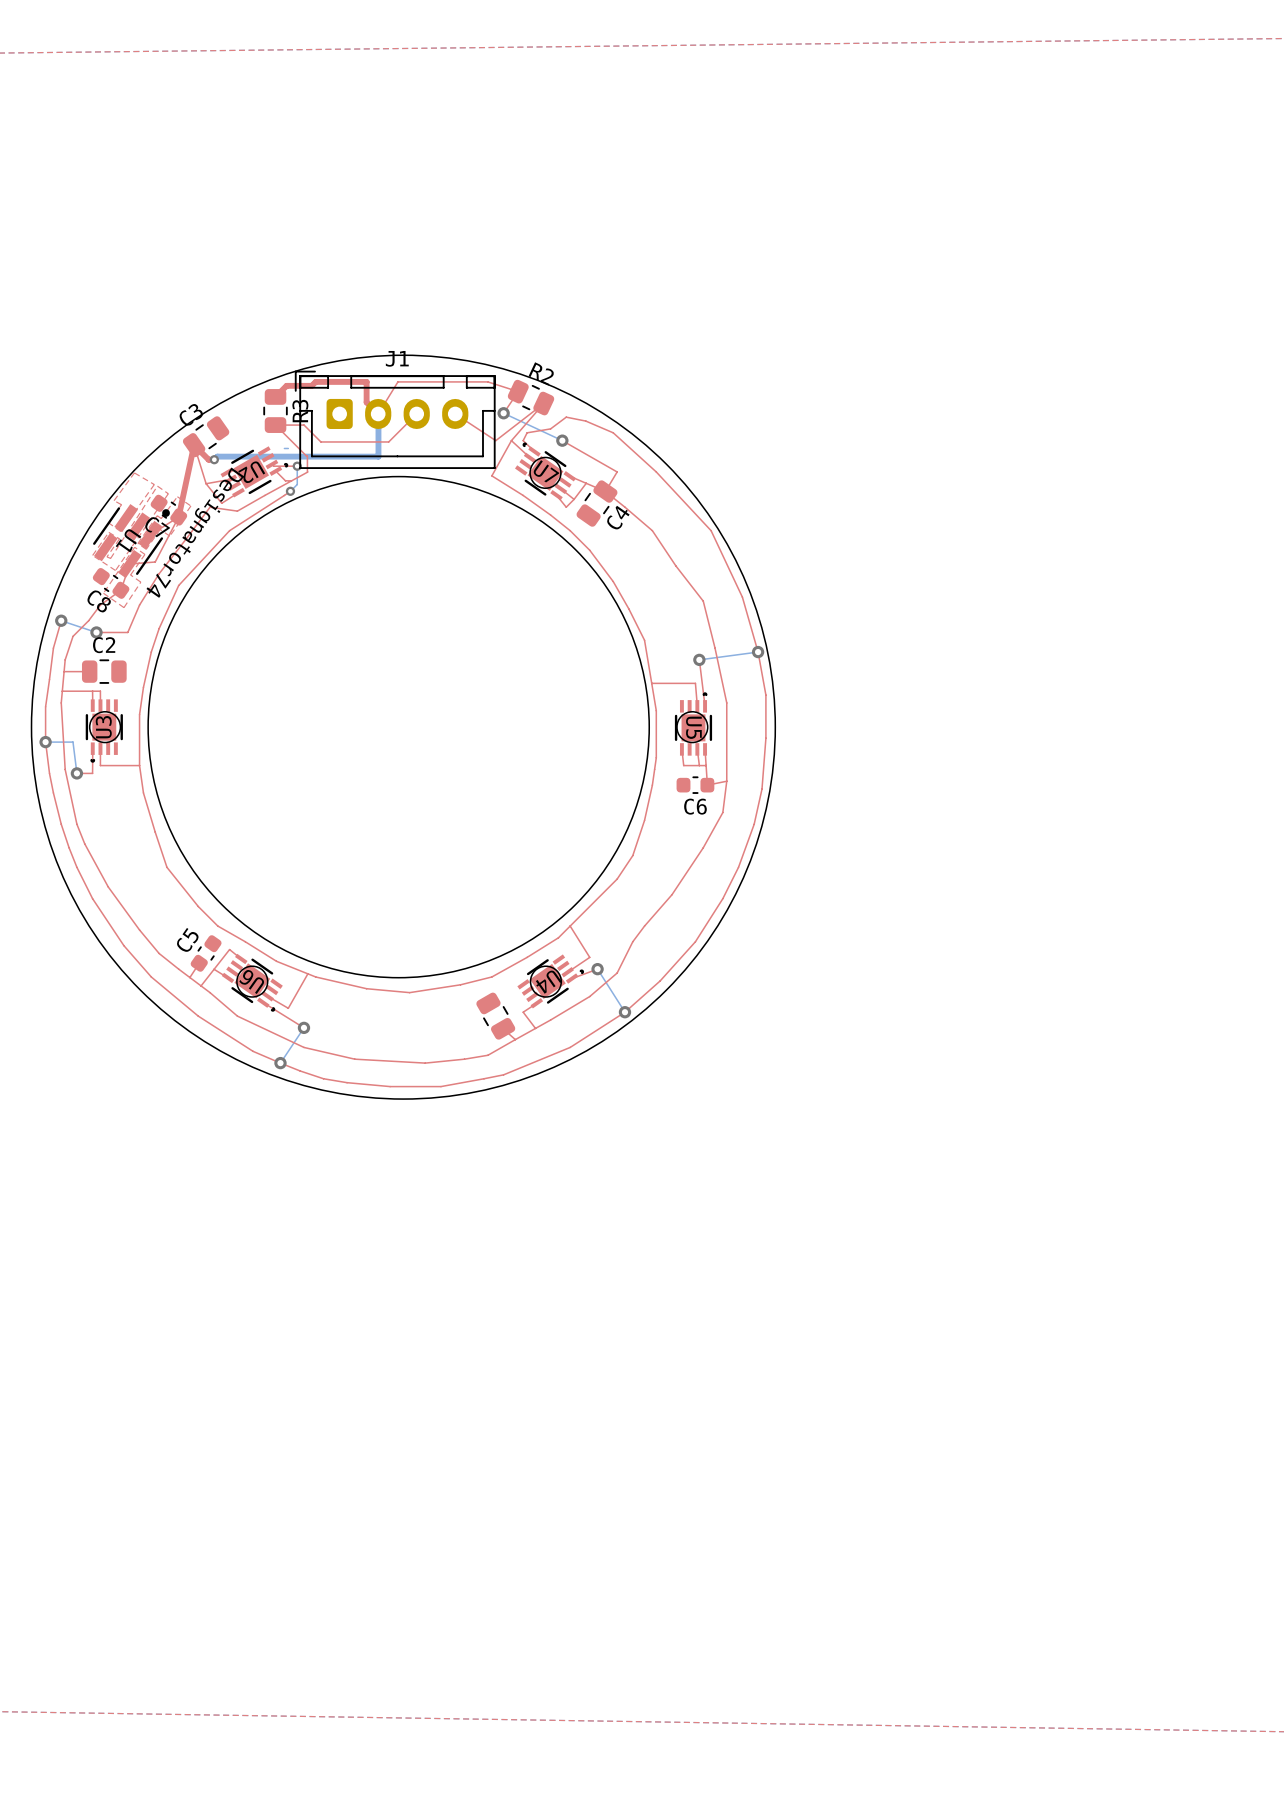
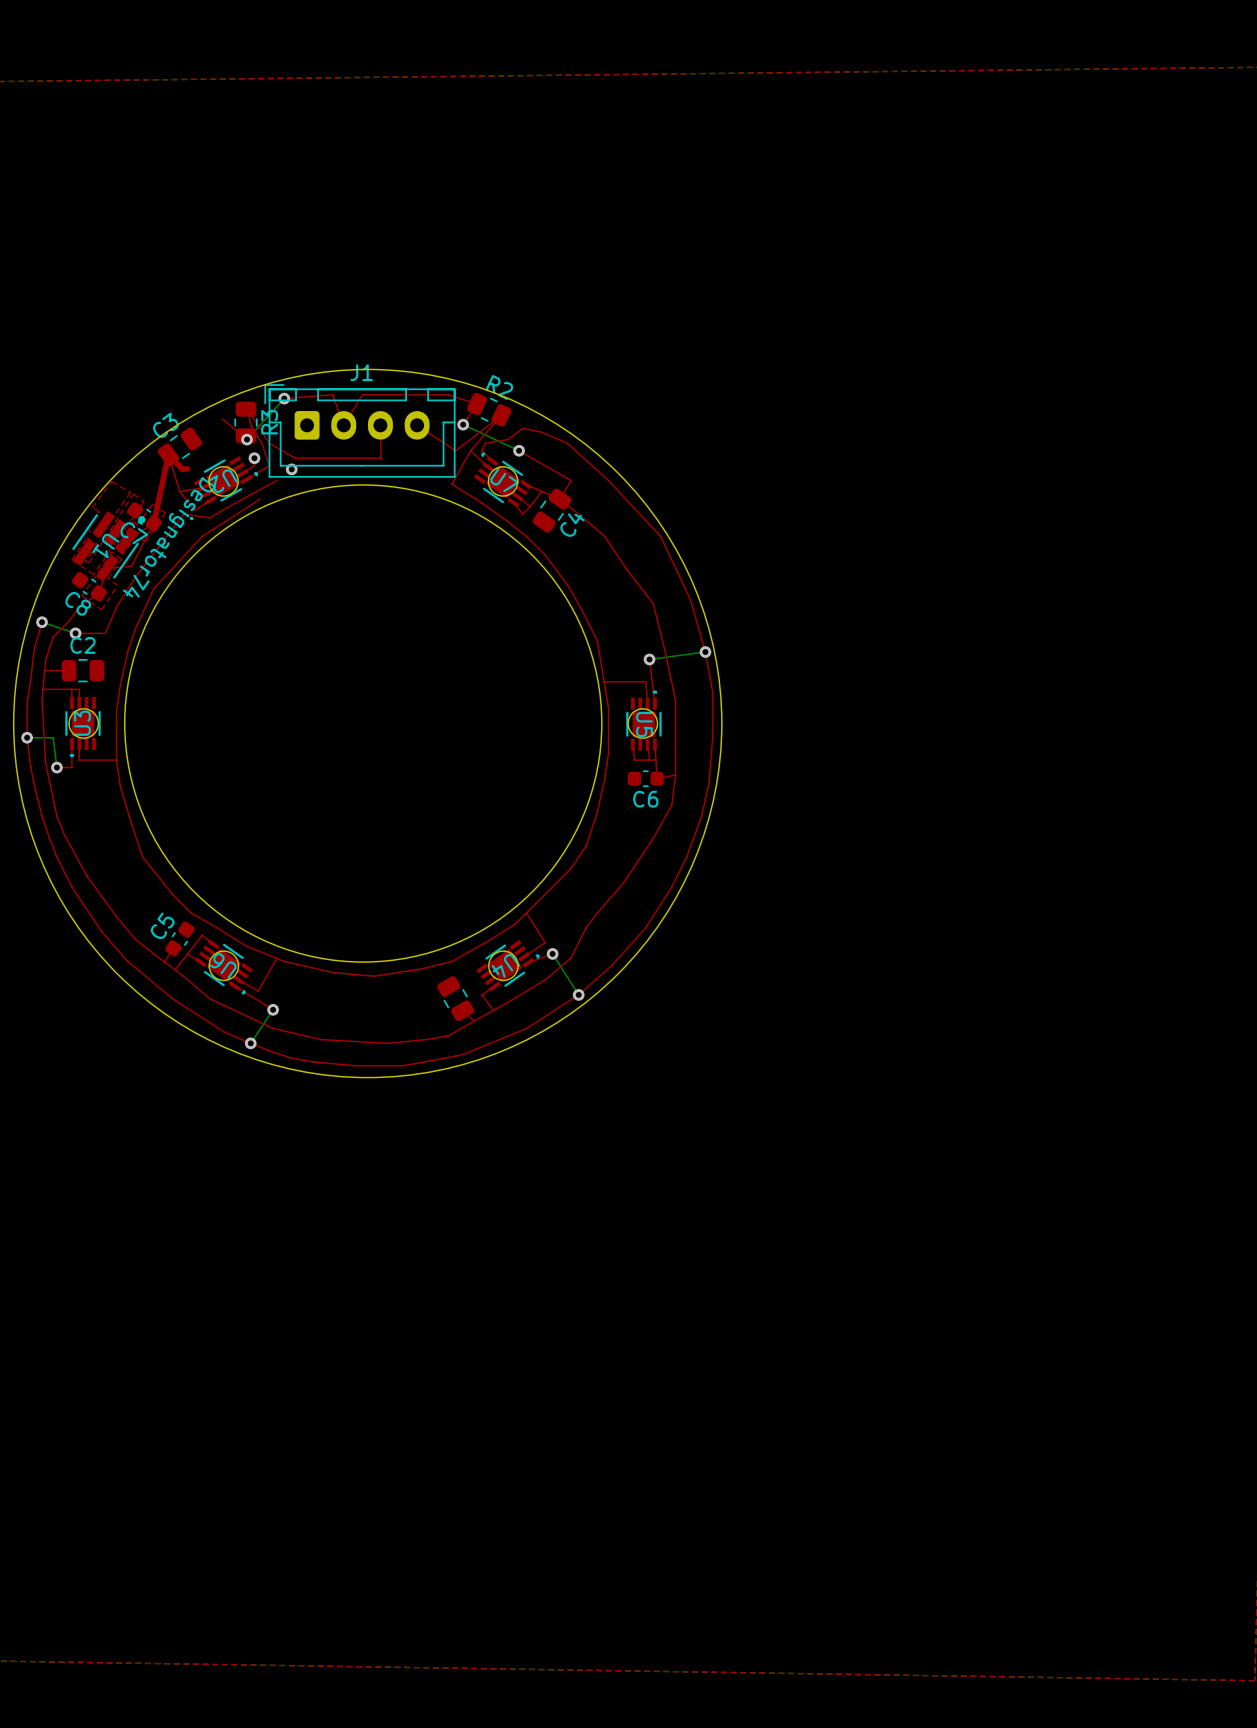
bottom track: none -> (284, 398) (247, 439)
via: none -> (284, 398)
top track: (275, 396) (286, 385) (311, 385) (315, 381) (366, 381) (366, 402) (378, 413) -> (280, 398) (332, 394) (343, 425)
top track: none -> (222, 419) (247, 439)
bottom track: (378, 413) (378, 456) (217, 456) (214, 459) -> none
top track: (416, 413) (388, 441) (320, 441) (304, 425) (275, 425) (307, 456) (307, 471) -> (380, 425) (381, 458) (295, 458) (269, 443) (247, 407) (250, 424) (261, 443) (269, 465) (246, 479)
via: none -> (247, 439)
via: none -> (254, 458)
round board edge: none -> [208, 466, 239, 497]
via: (214, 459) -> none
via: none -> (291, 469)
top track: (271, 464) (273, 466) (297, 466) -> (242, 473) (254, 465) (254, 458)
bottom track: (297, 466) (297, 484) (290, 491) -> none
via: (297, 466) -> none
top track: (275, 471) (285, 480) (291, 480) -> none
via: (290, 491) -> none

